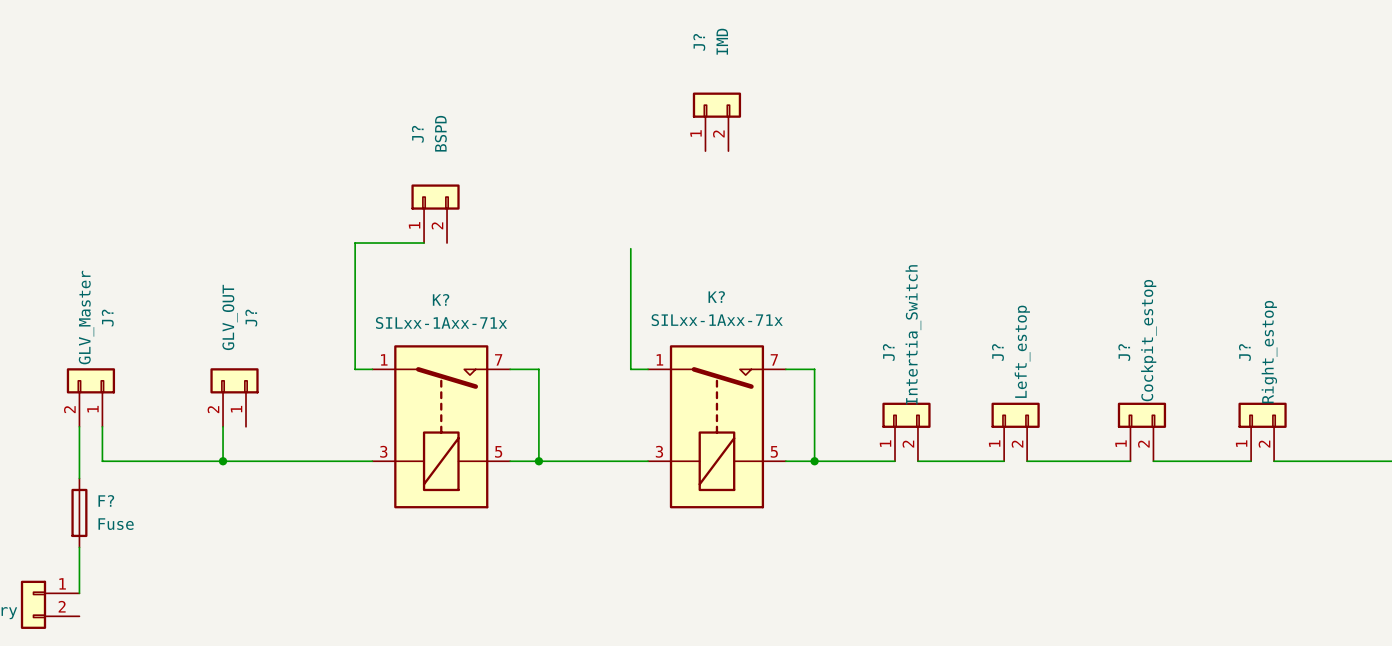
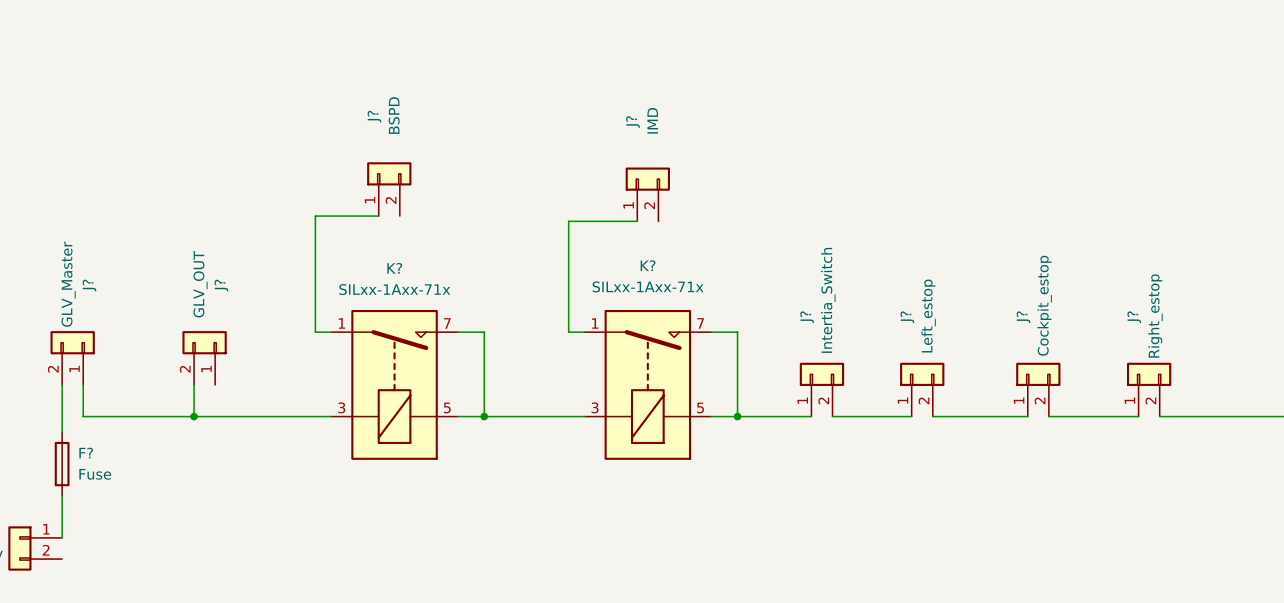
J? position: (716, 121) -> (647, 194)
wire: none -> (568, 221) (637, 221)

